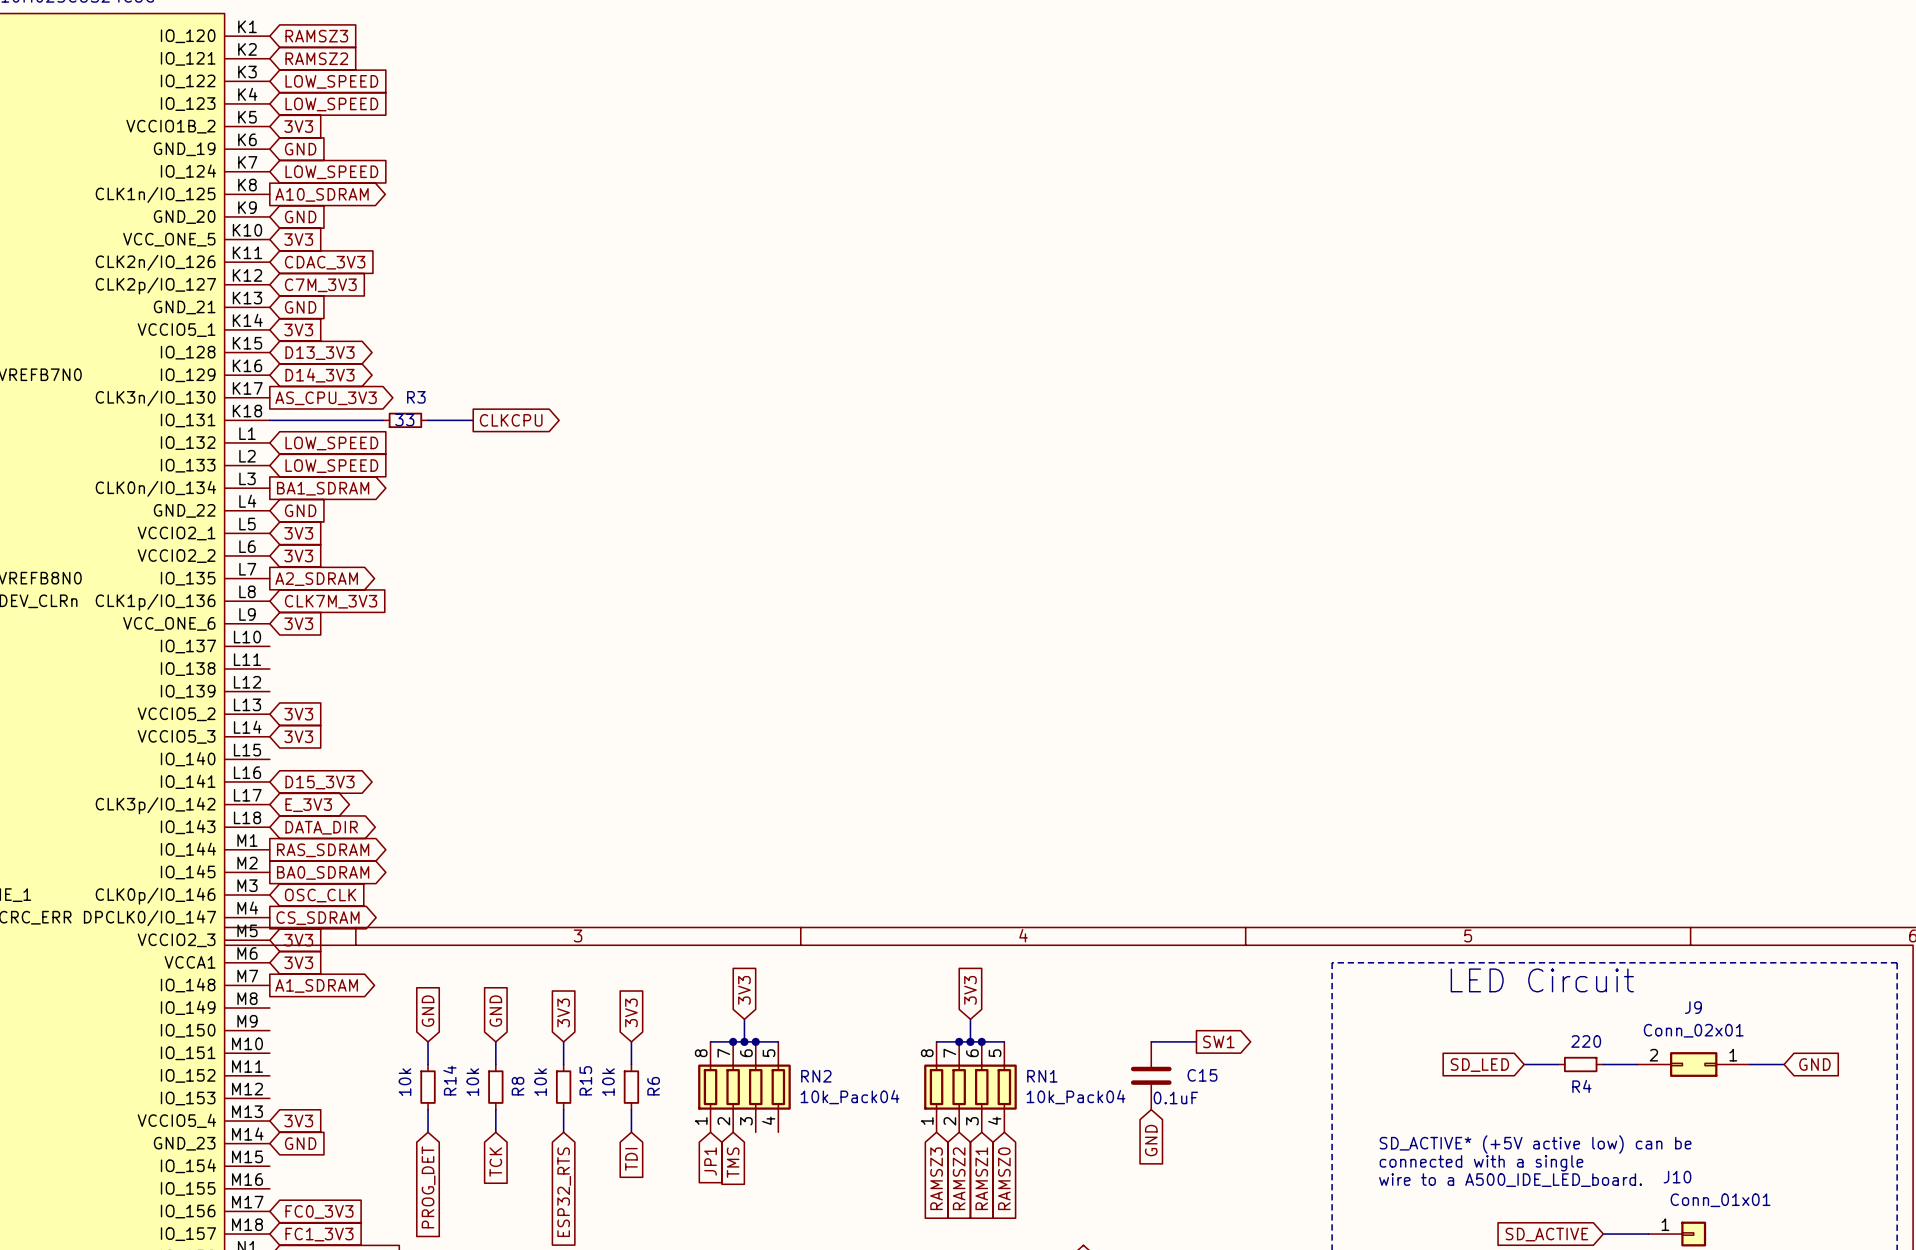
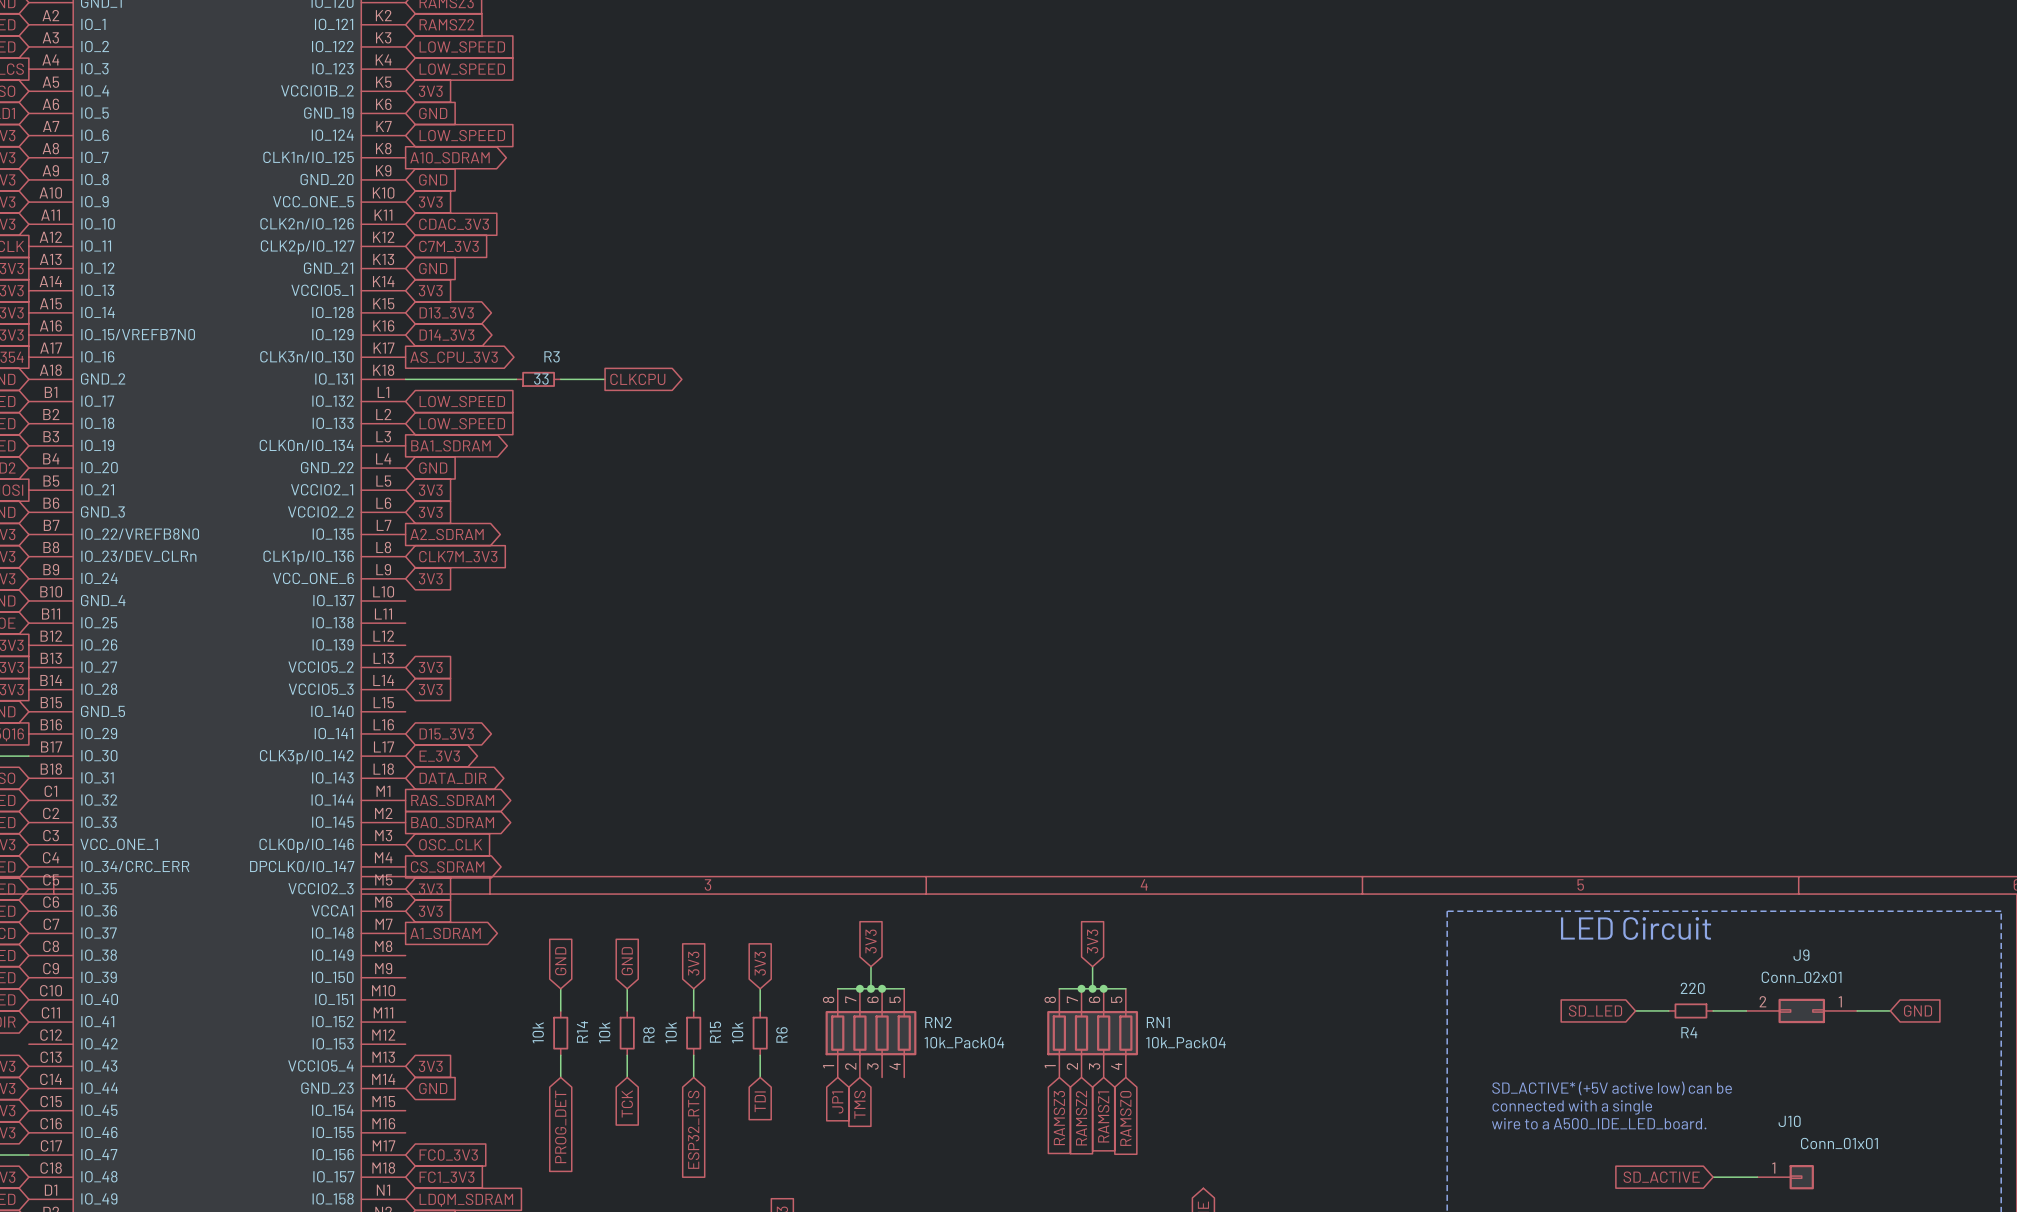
wire: (1151, 1041) (1196, 1041) -> none
global label: SW1 (1218, 1041) -> none
C15: 0.1uF (1151, 1075) -> none
global label: GND (1151, 1140) -> none

